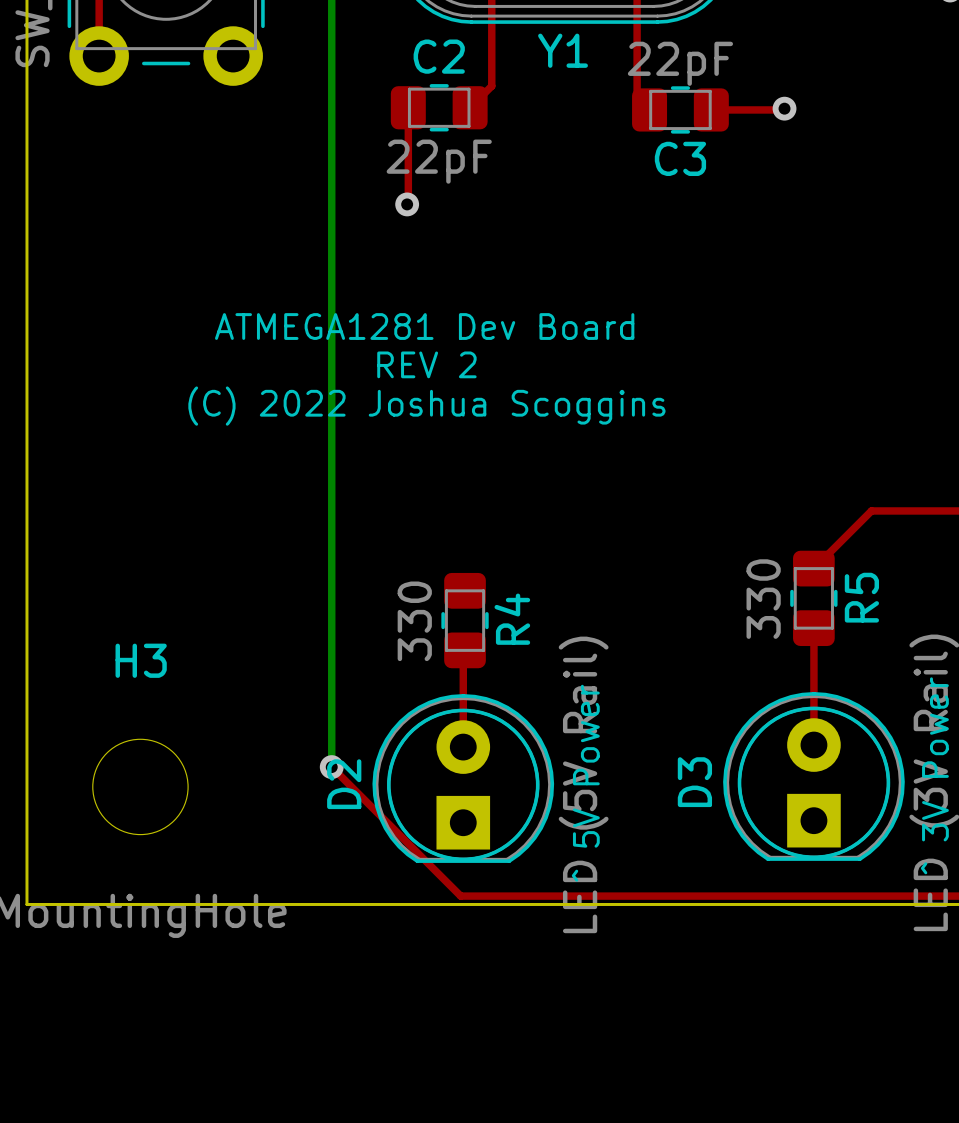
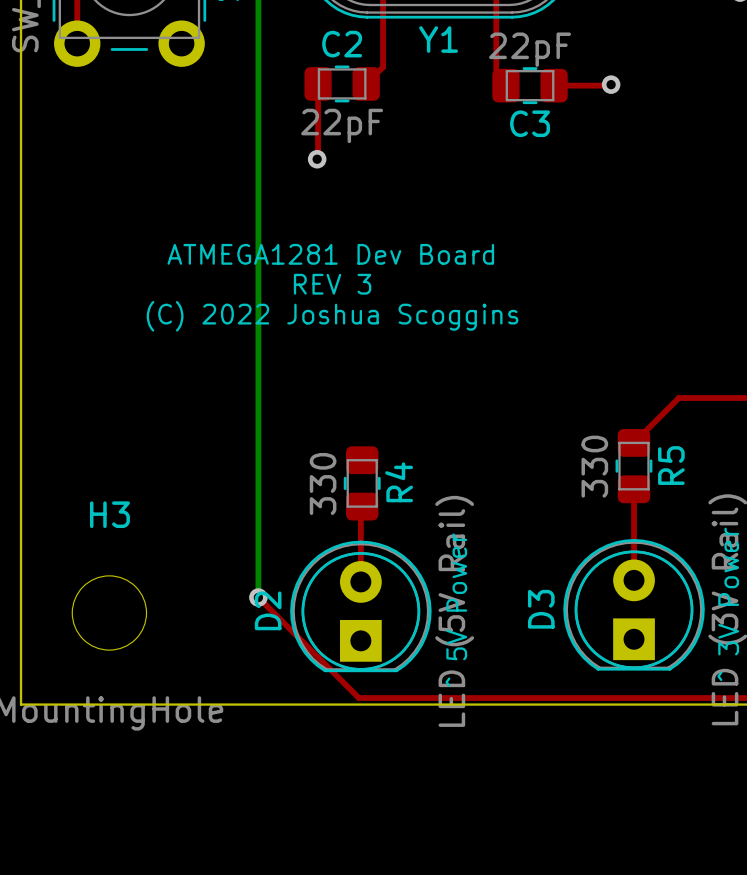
text: REV 2 (426, 364) -> REV 3 (332, 284)

